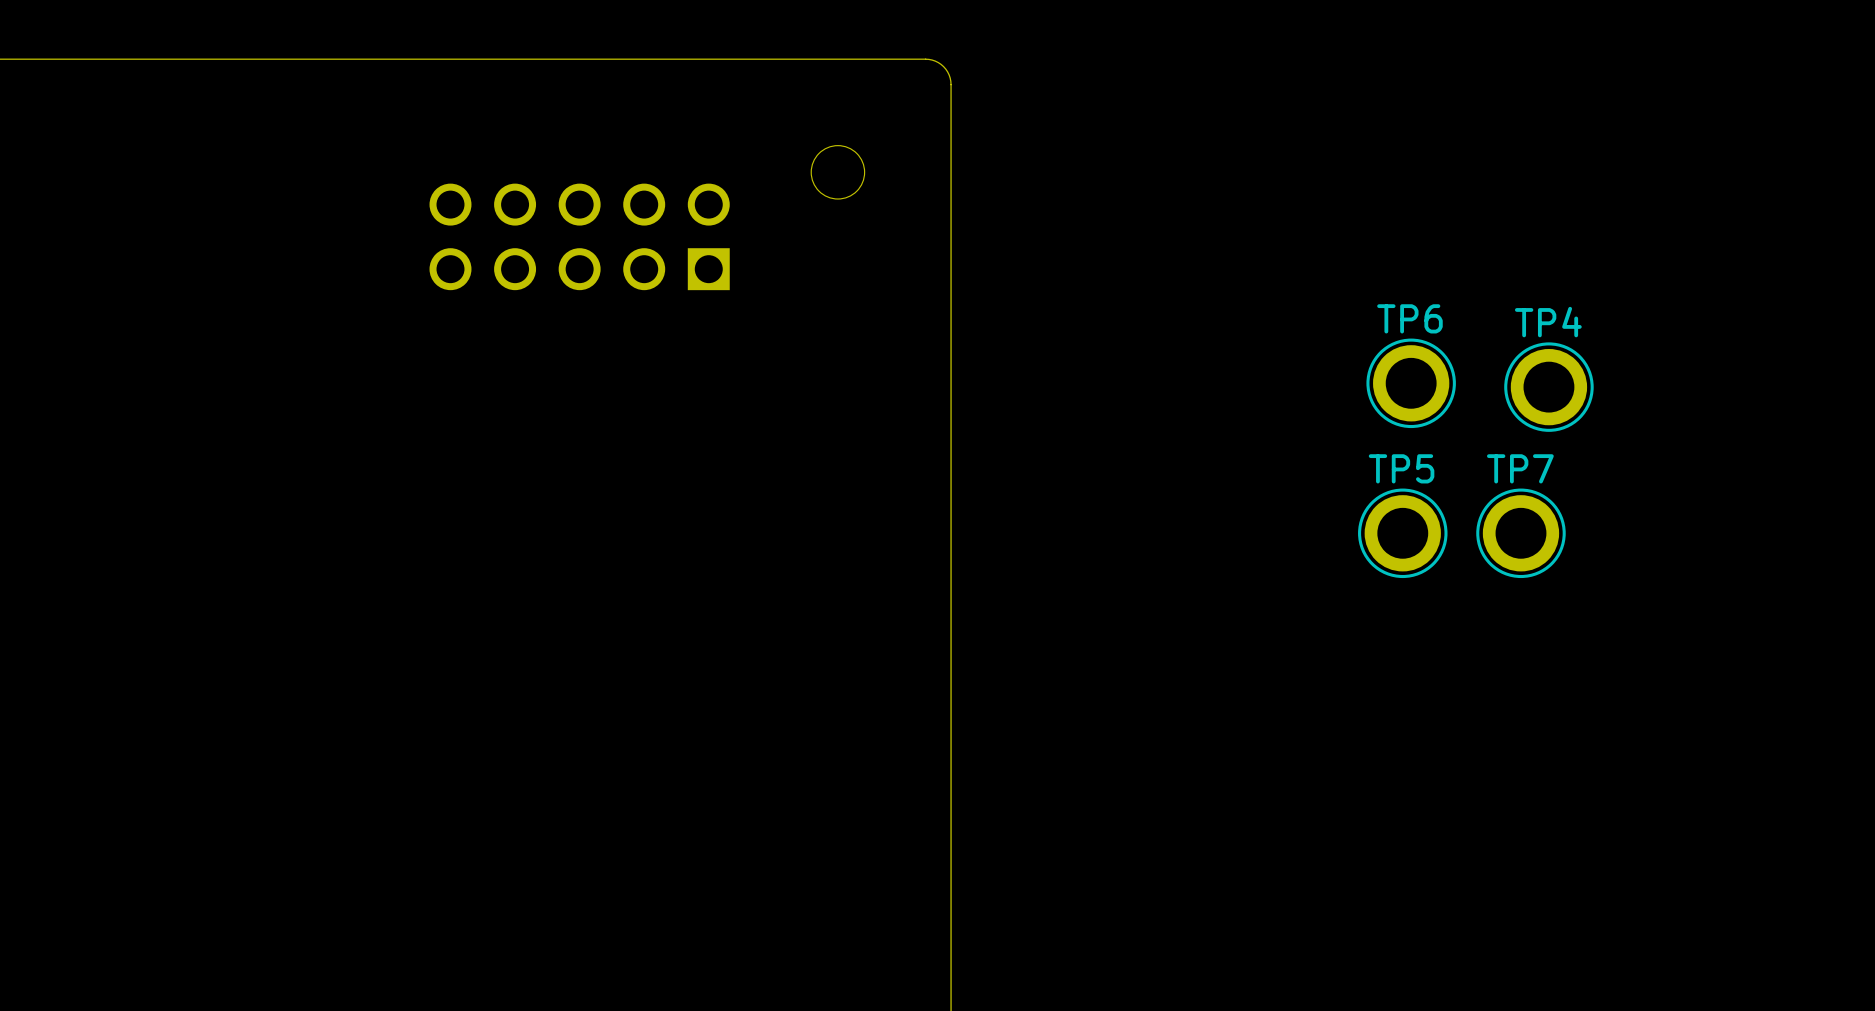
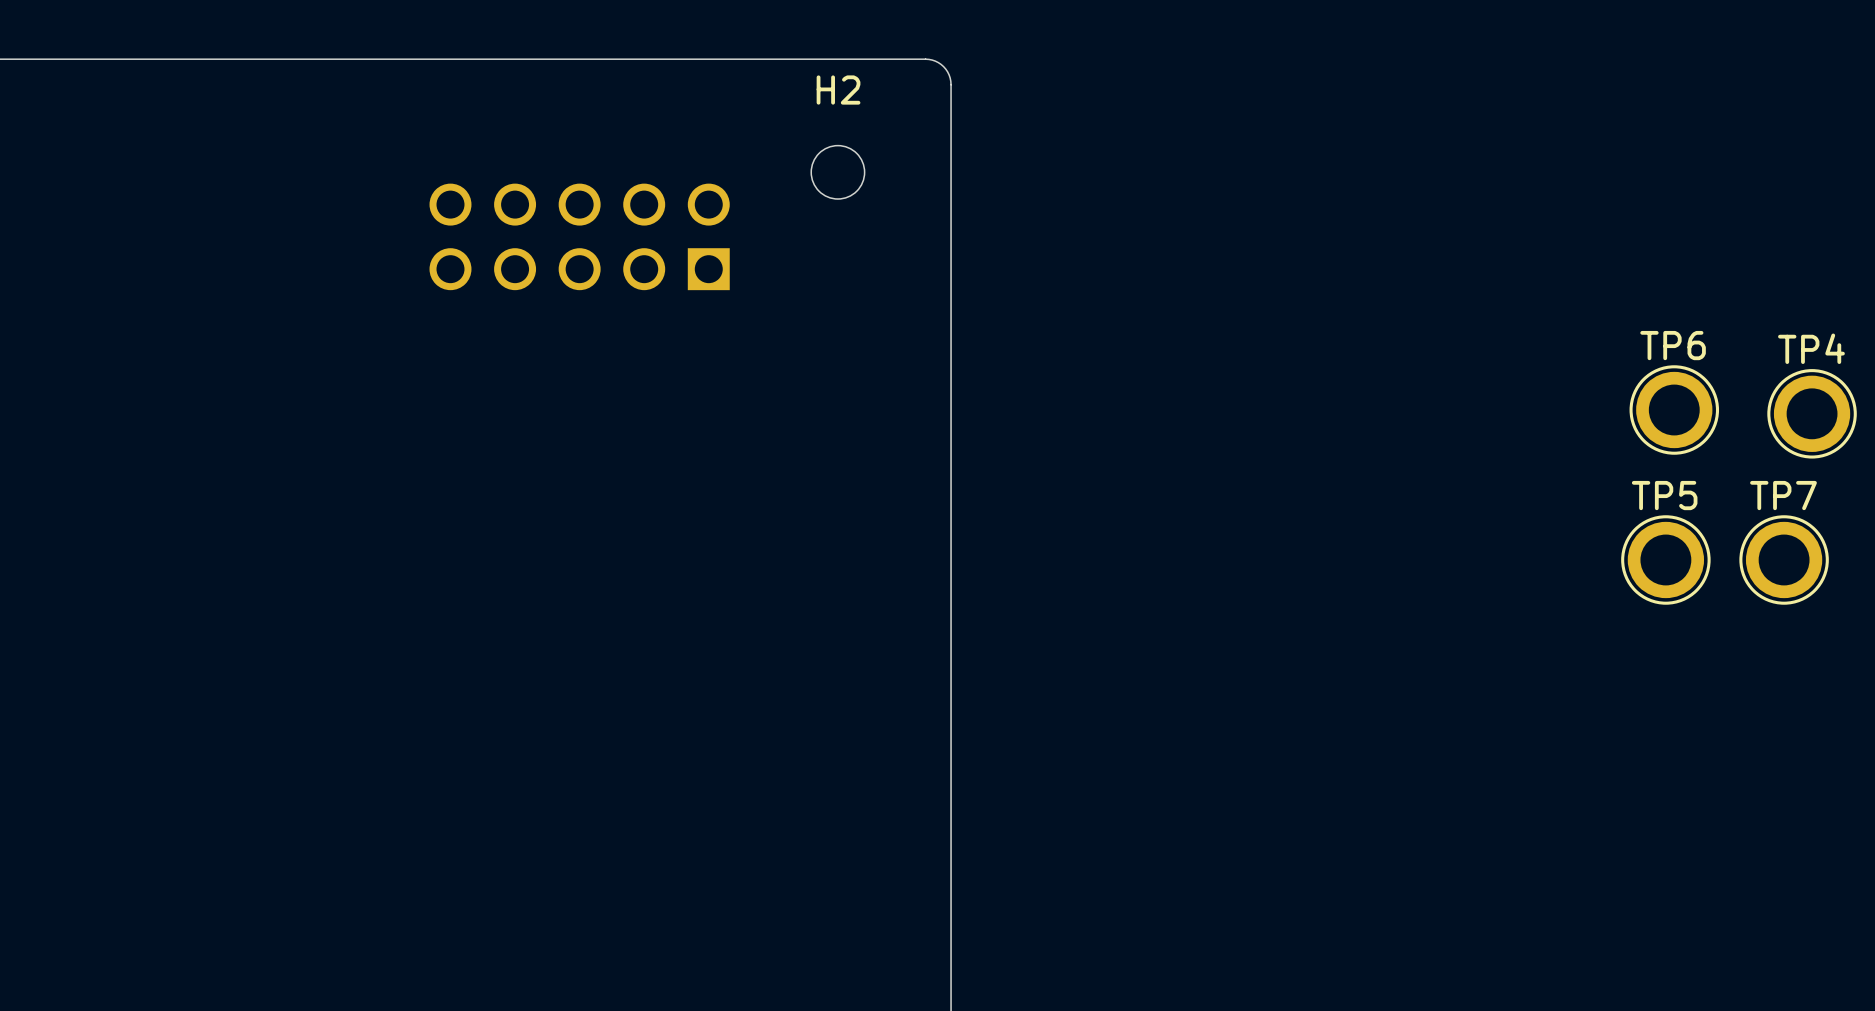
H2 name: none -> H2 (838, 90)
TP6 position: (1411, 383) -> (1674, 410)
TP4 position: (1548, 387) -> (1812, 413)
TP5 position: (1402, 533) -> (1665, 559)
TP7 position: (1520, 533) -> (1784, 559)

